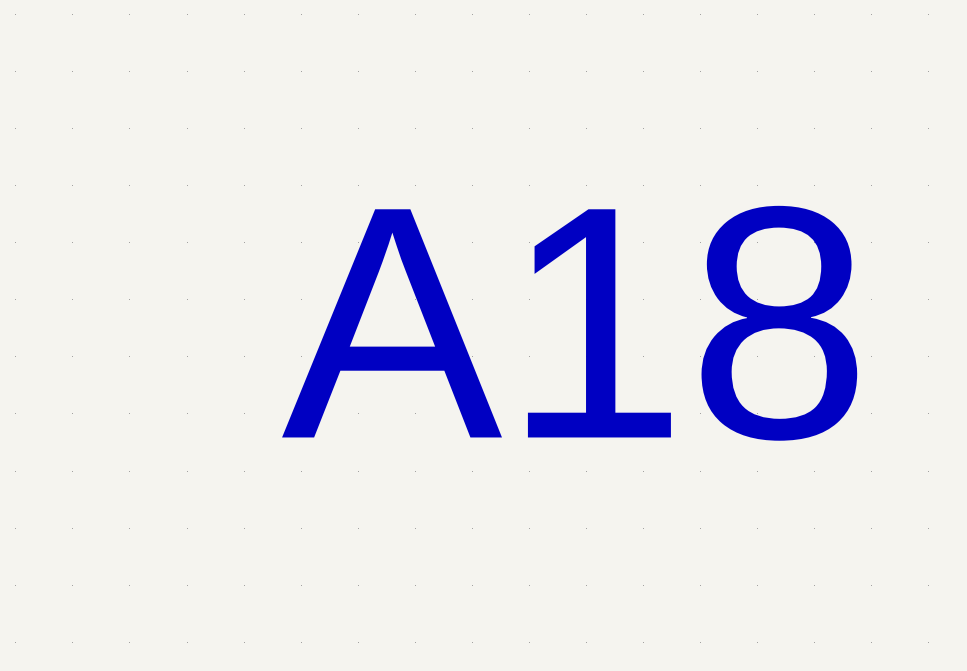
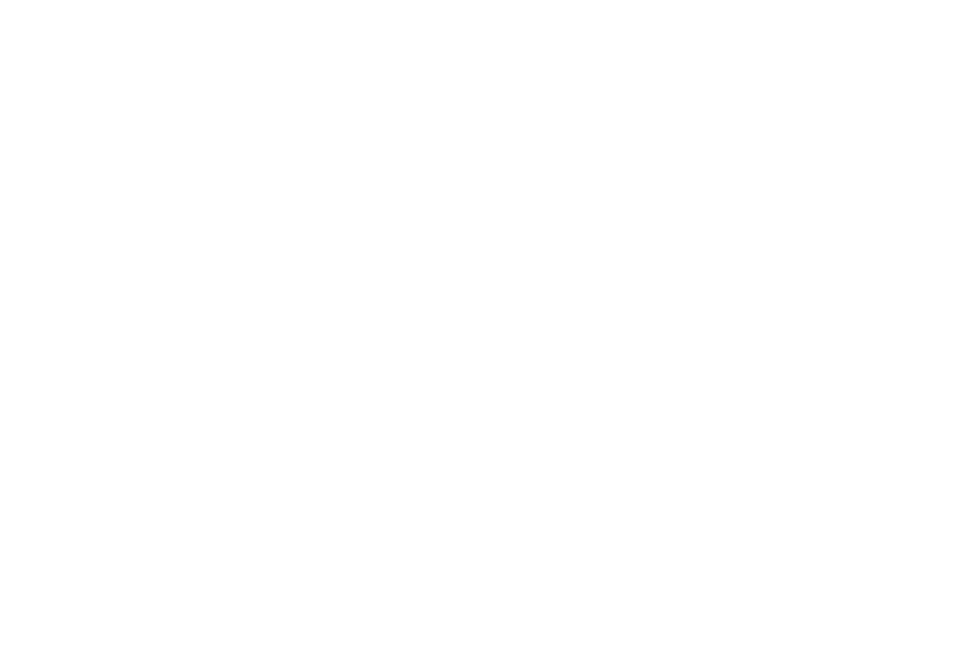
text: A18 (569, 323) -> none

